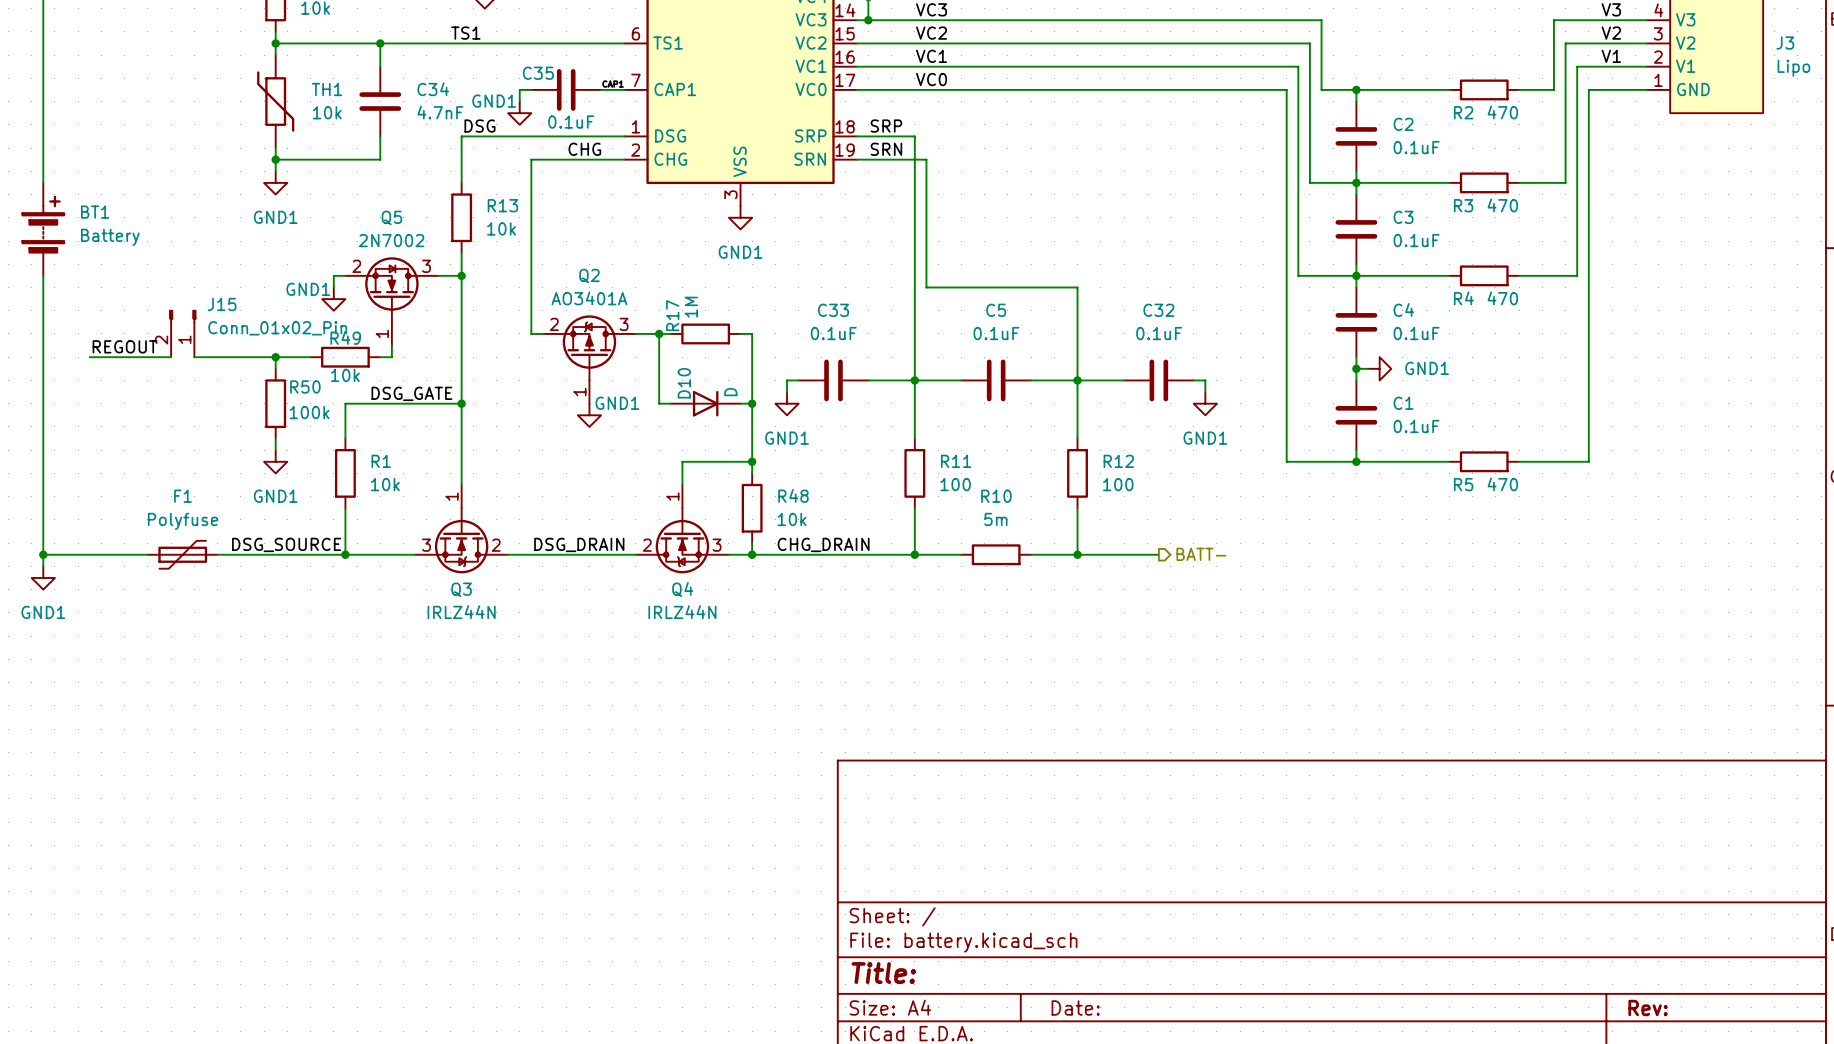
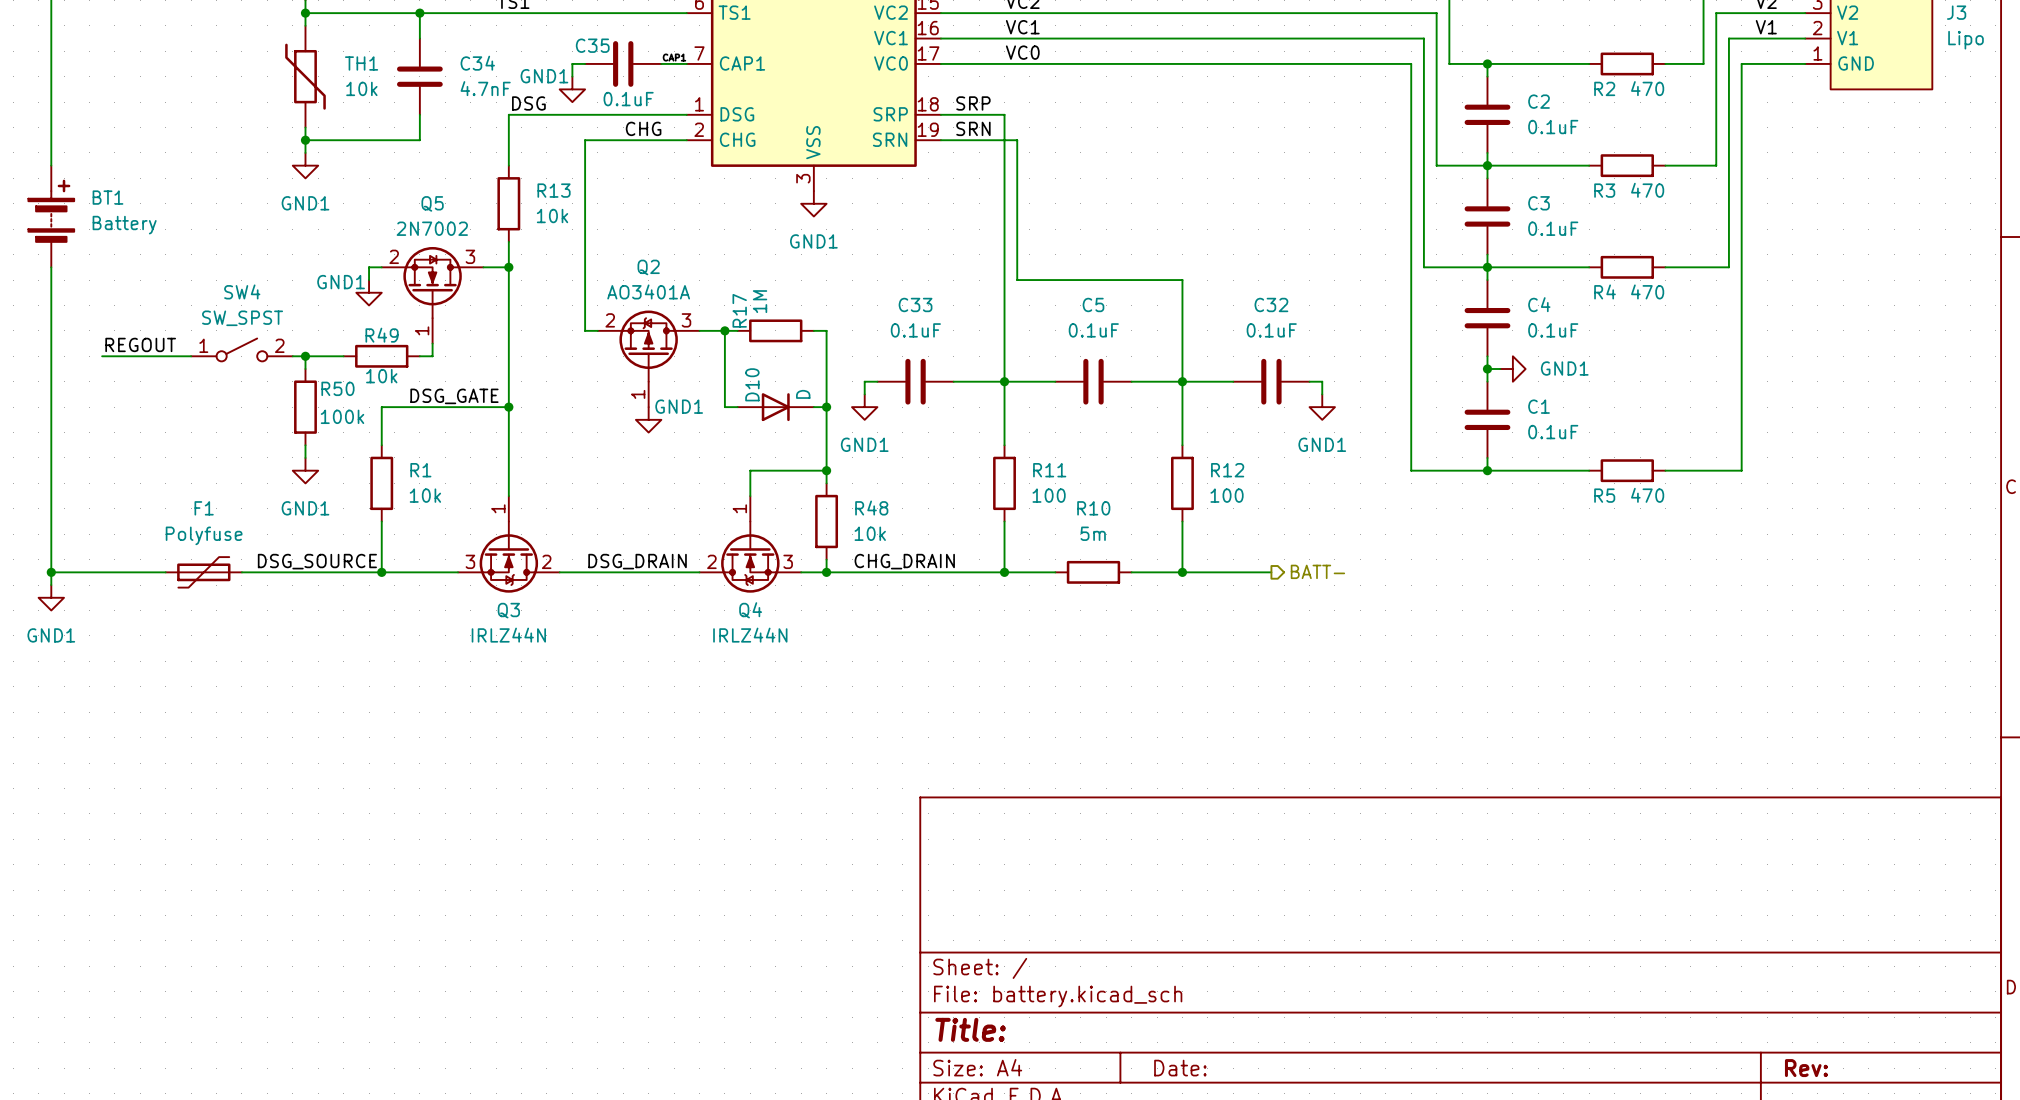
J15: Conn_01x02_Pin (182, 333) -> none
SW4: none -> SW_SPST (241, 349)
wire: (194, 357) (264, 357) -> none

